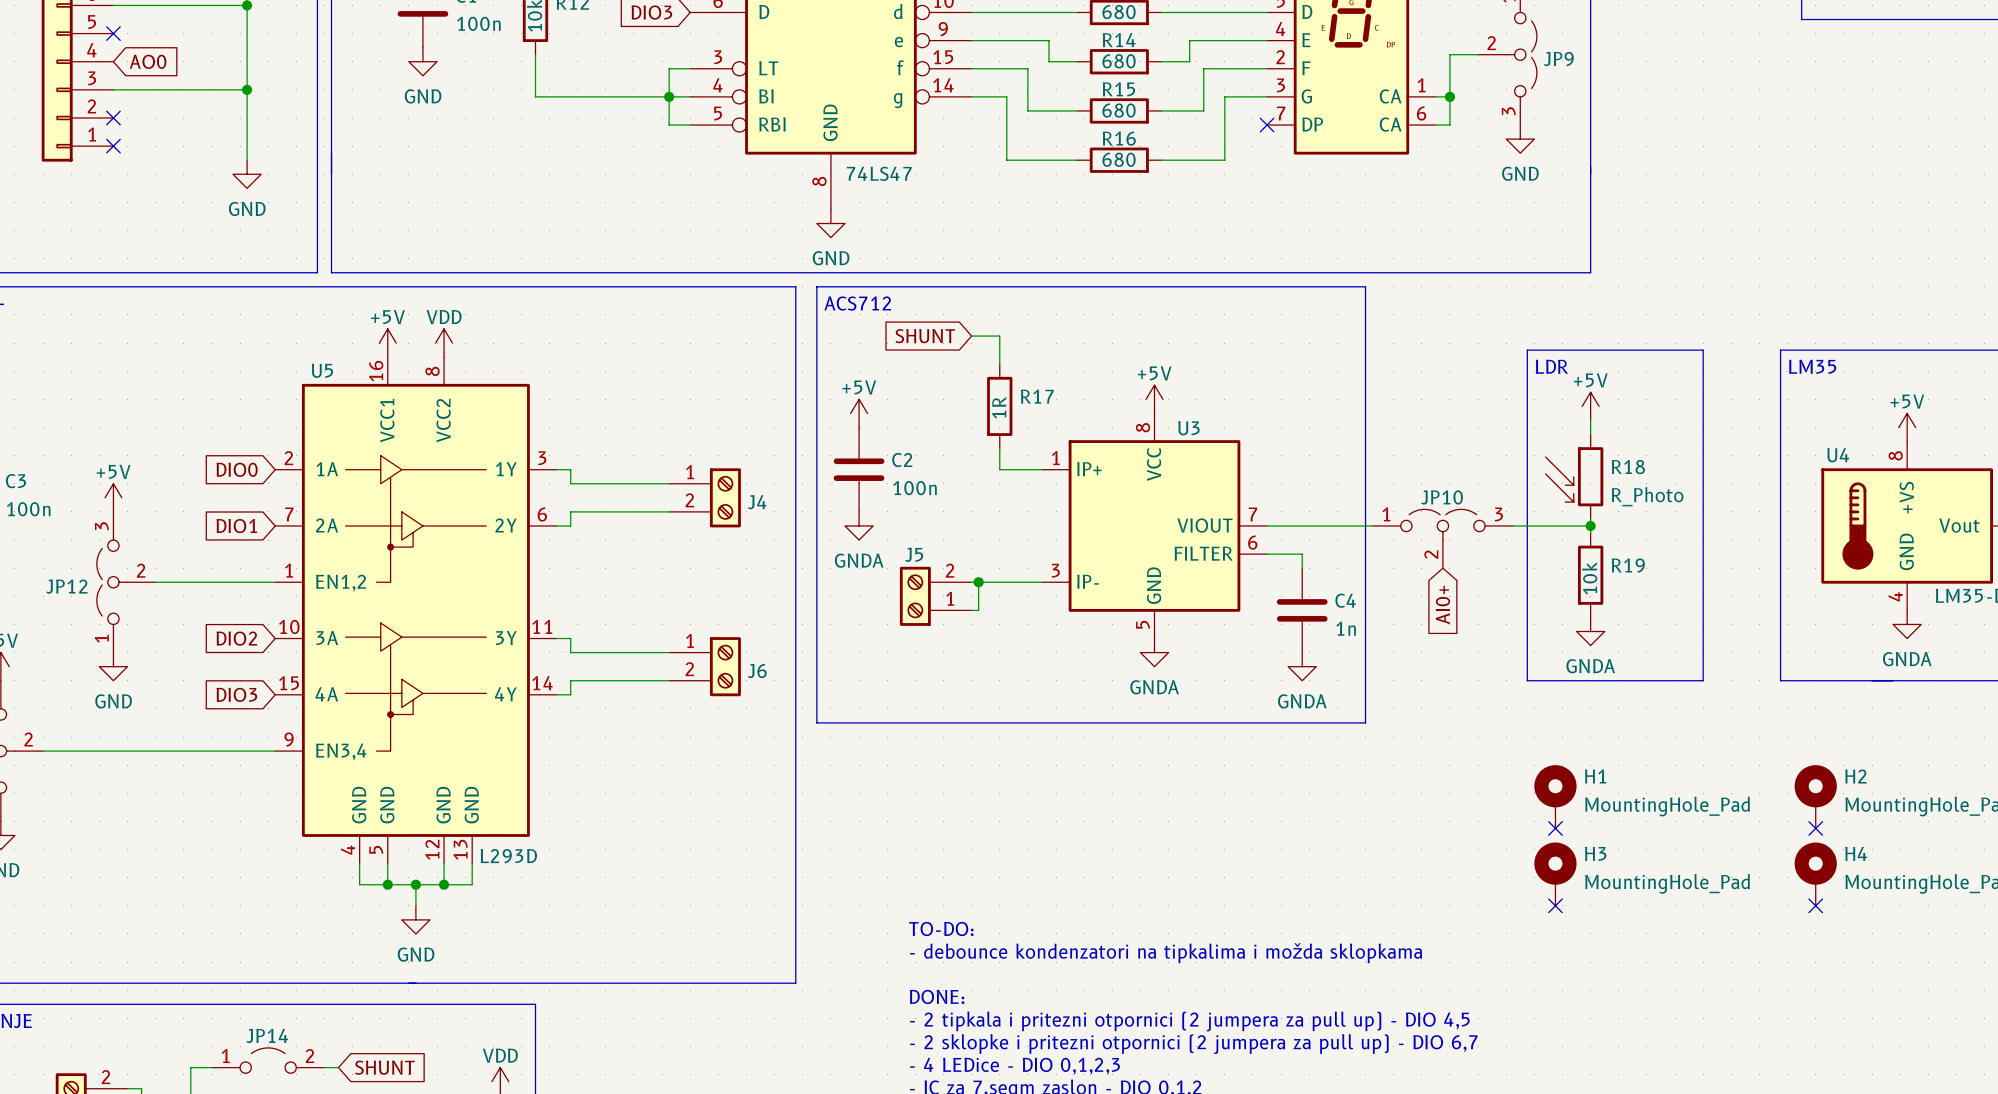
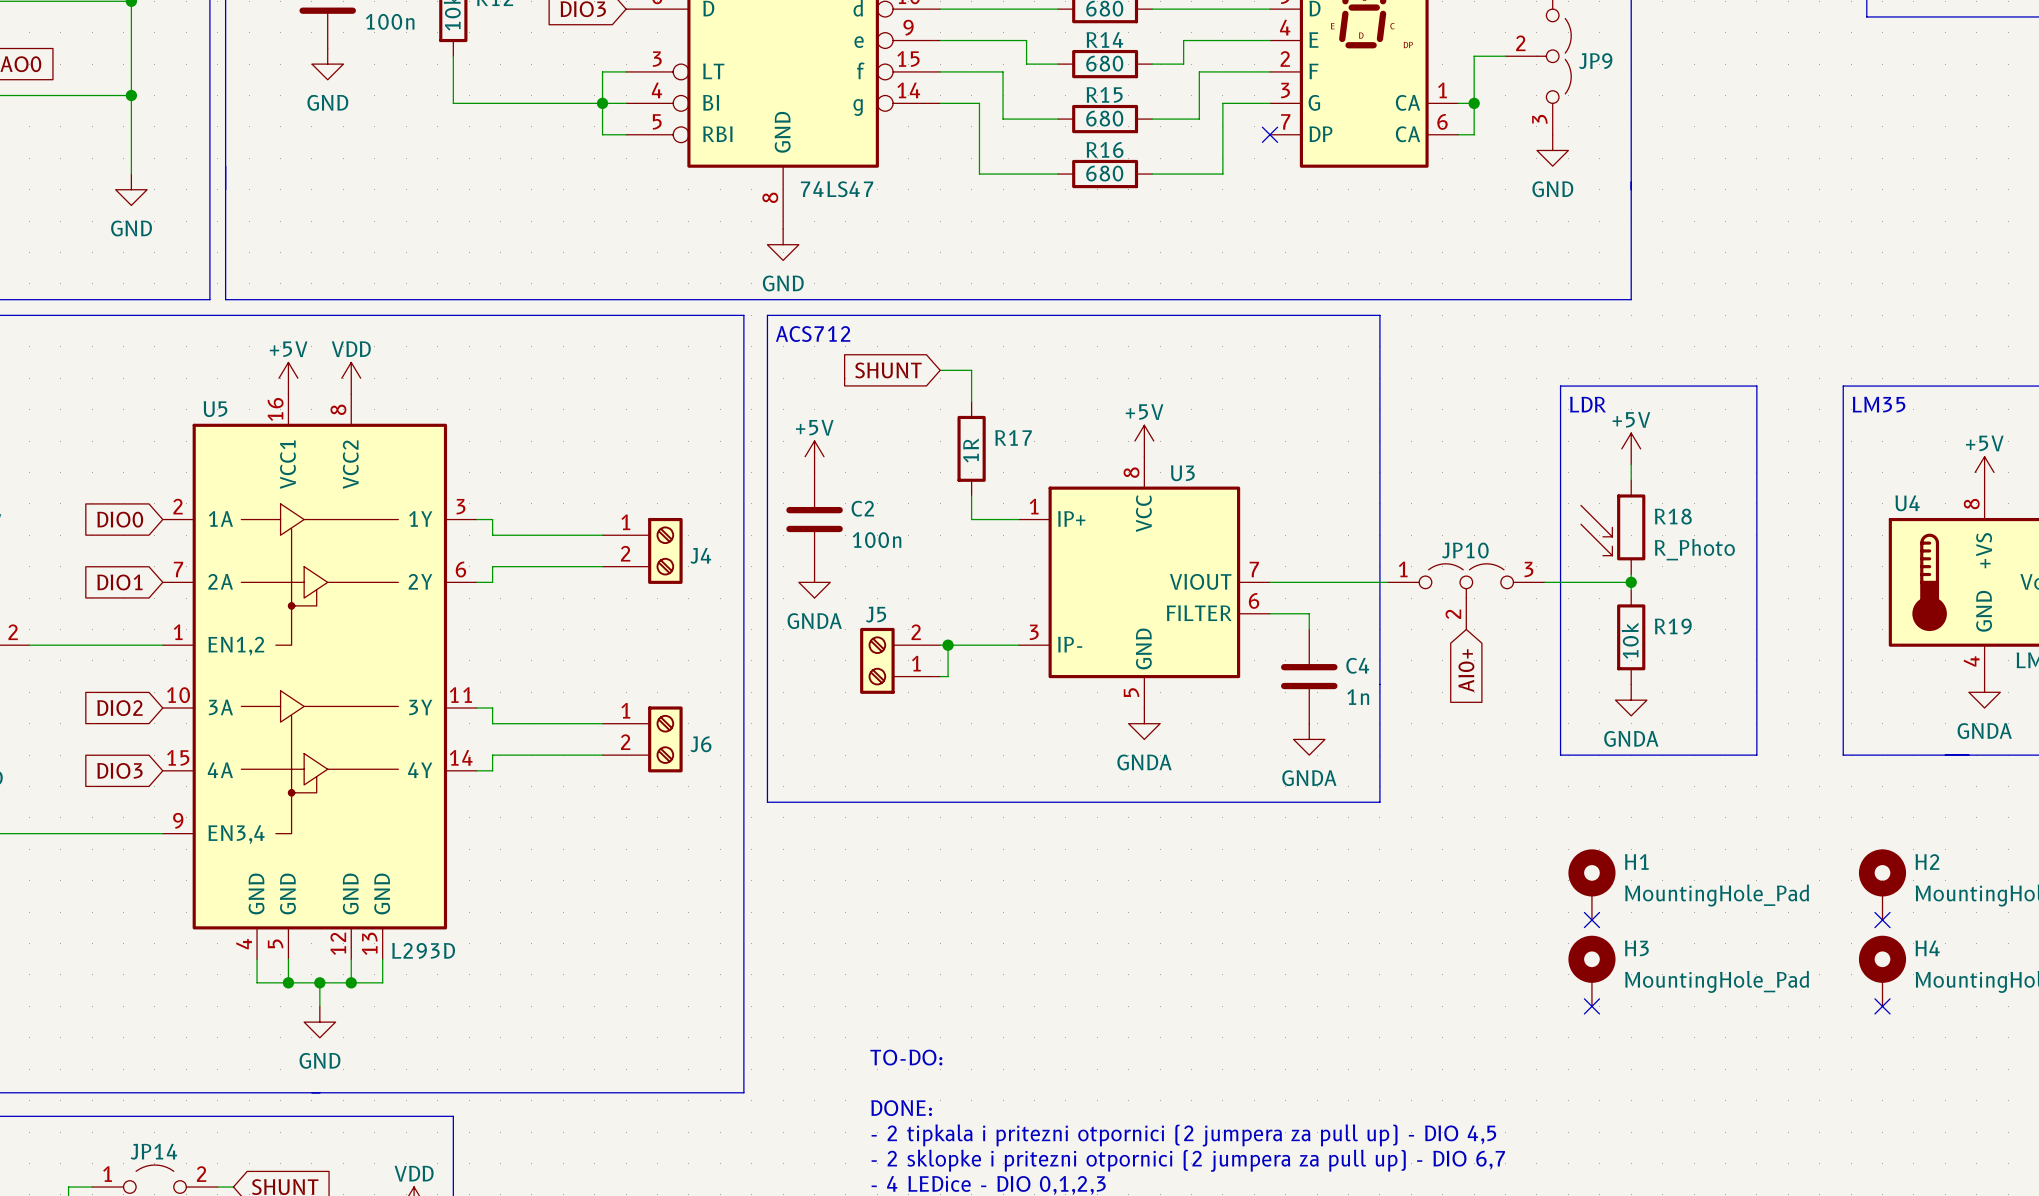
text: TO-DO: (941, 929) -> none
text: - debounce kondenzatori na tipkalima i možda sklopkama (1166, 953) -> TO-DO: (906, 1057)

